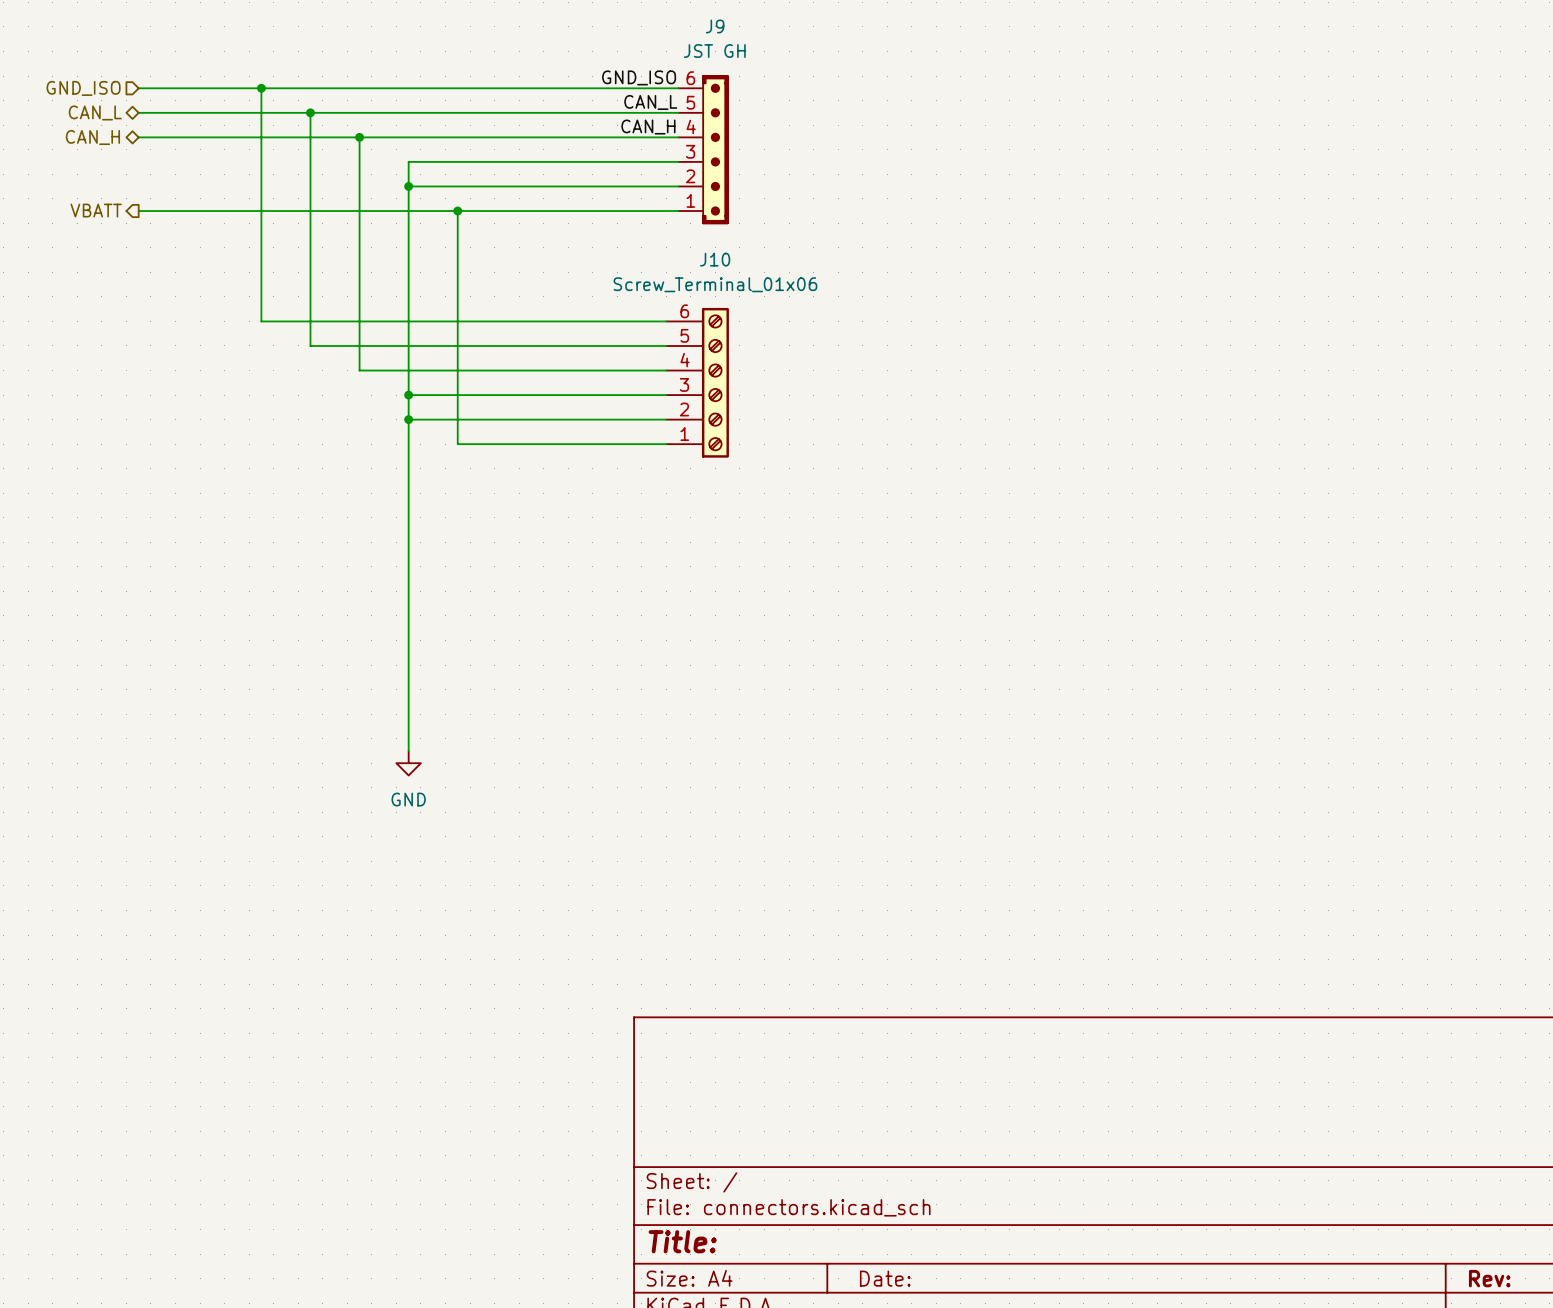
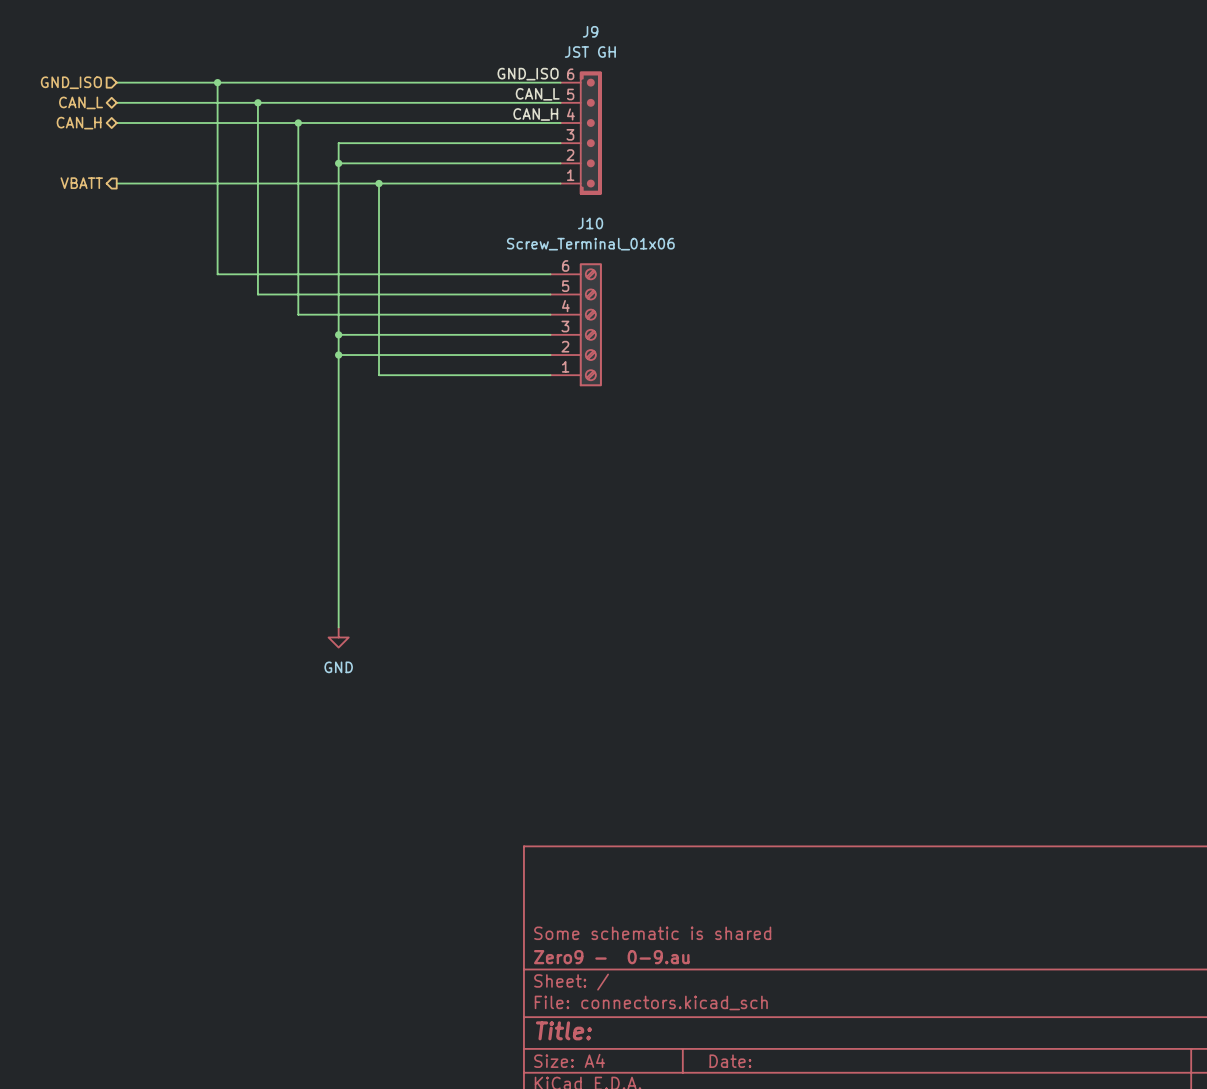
title block: none -> Some schematic is shared (652, 933)
title block: none -> Zero9 - 0-9.au (611, 957)

